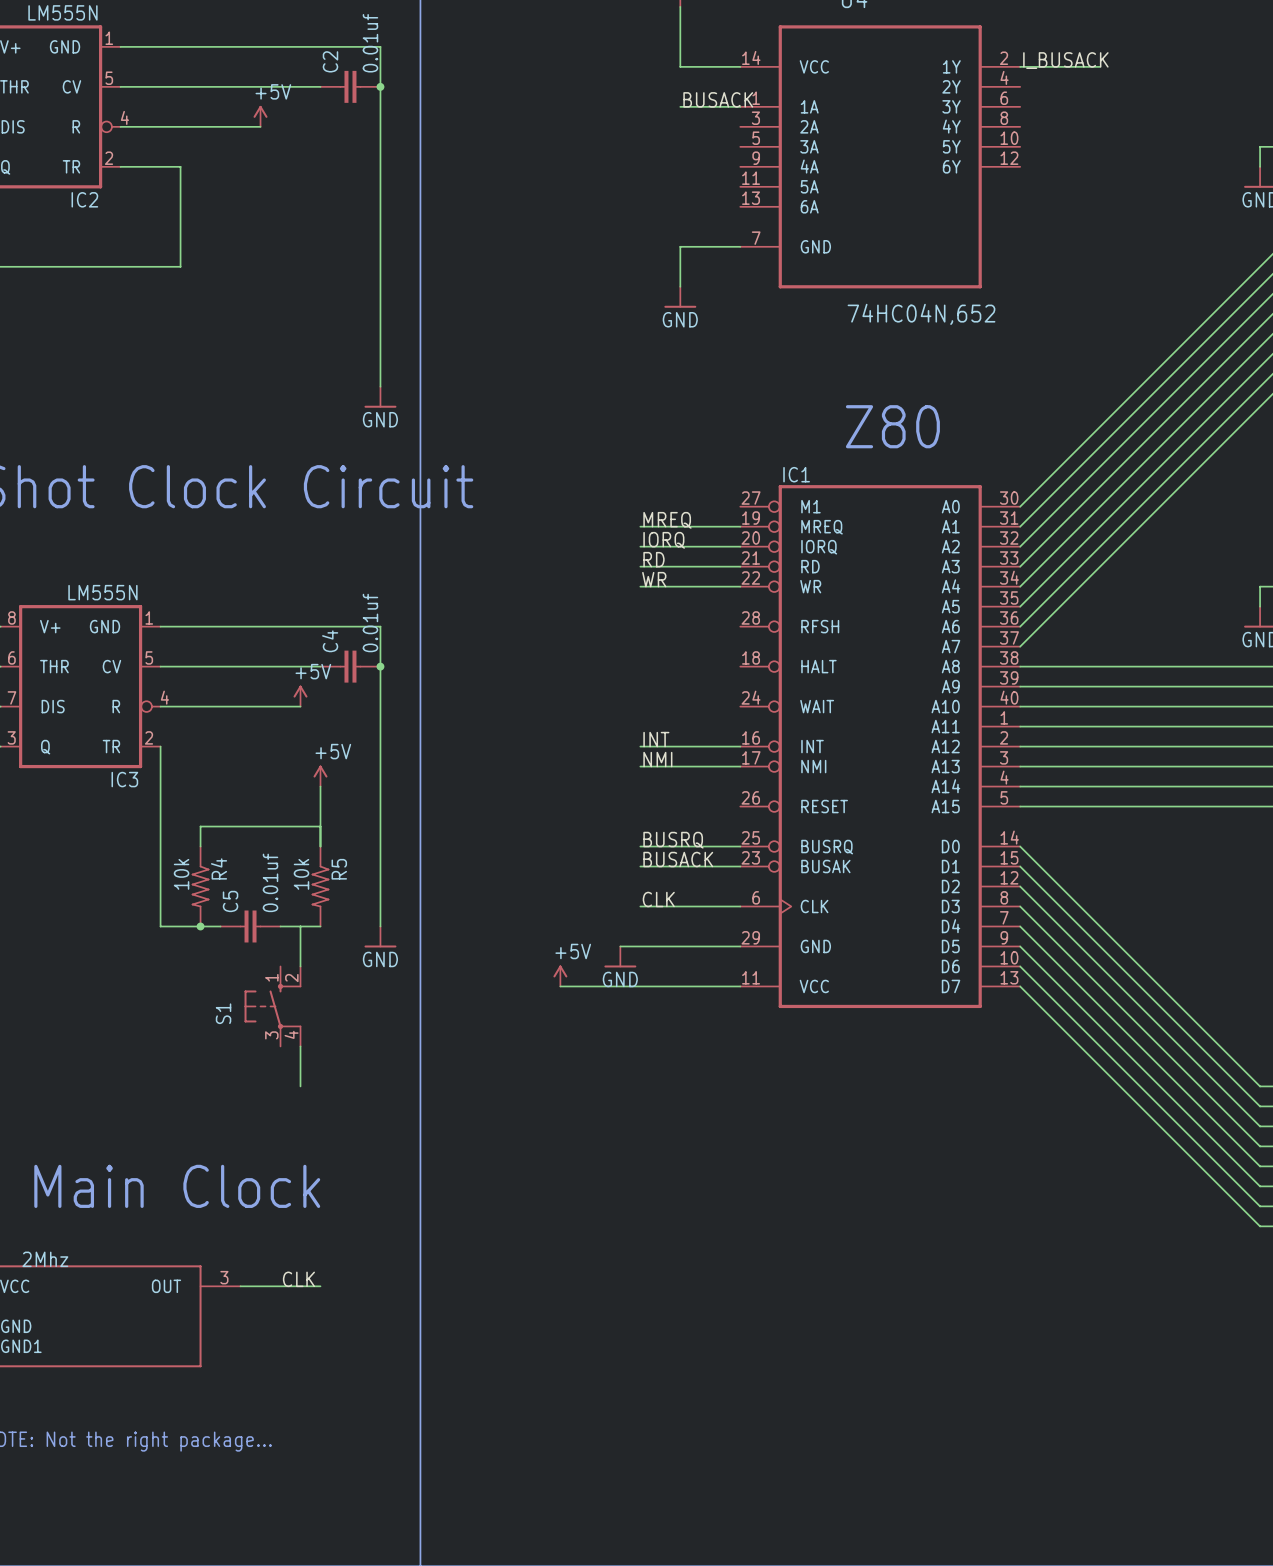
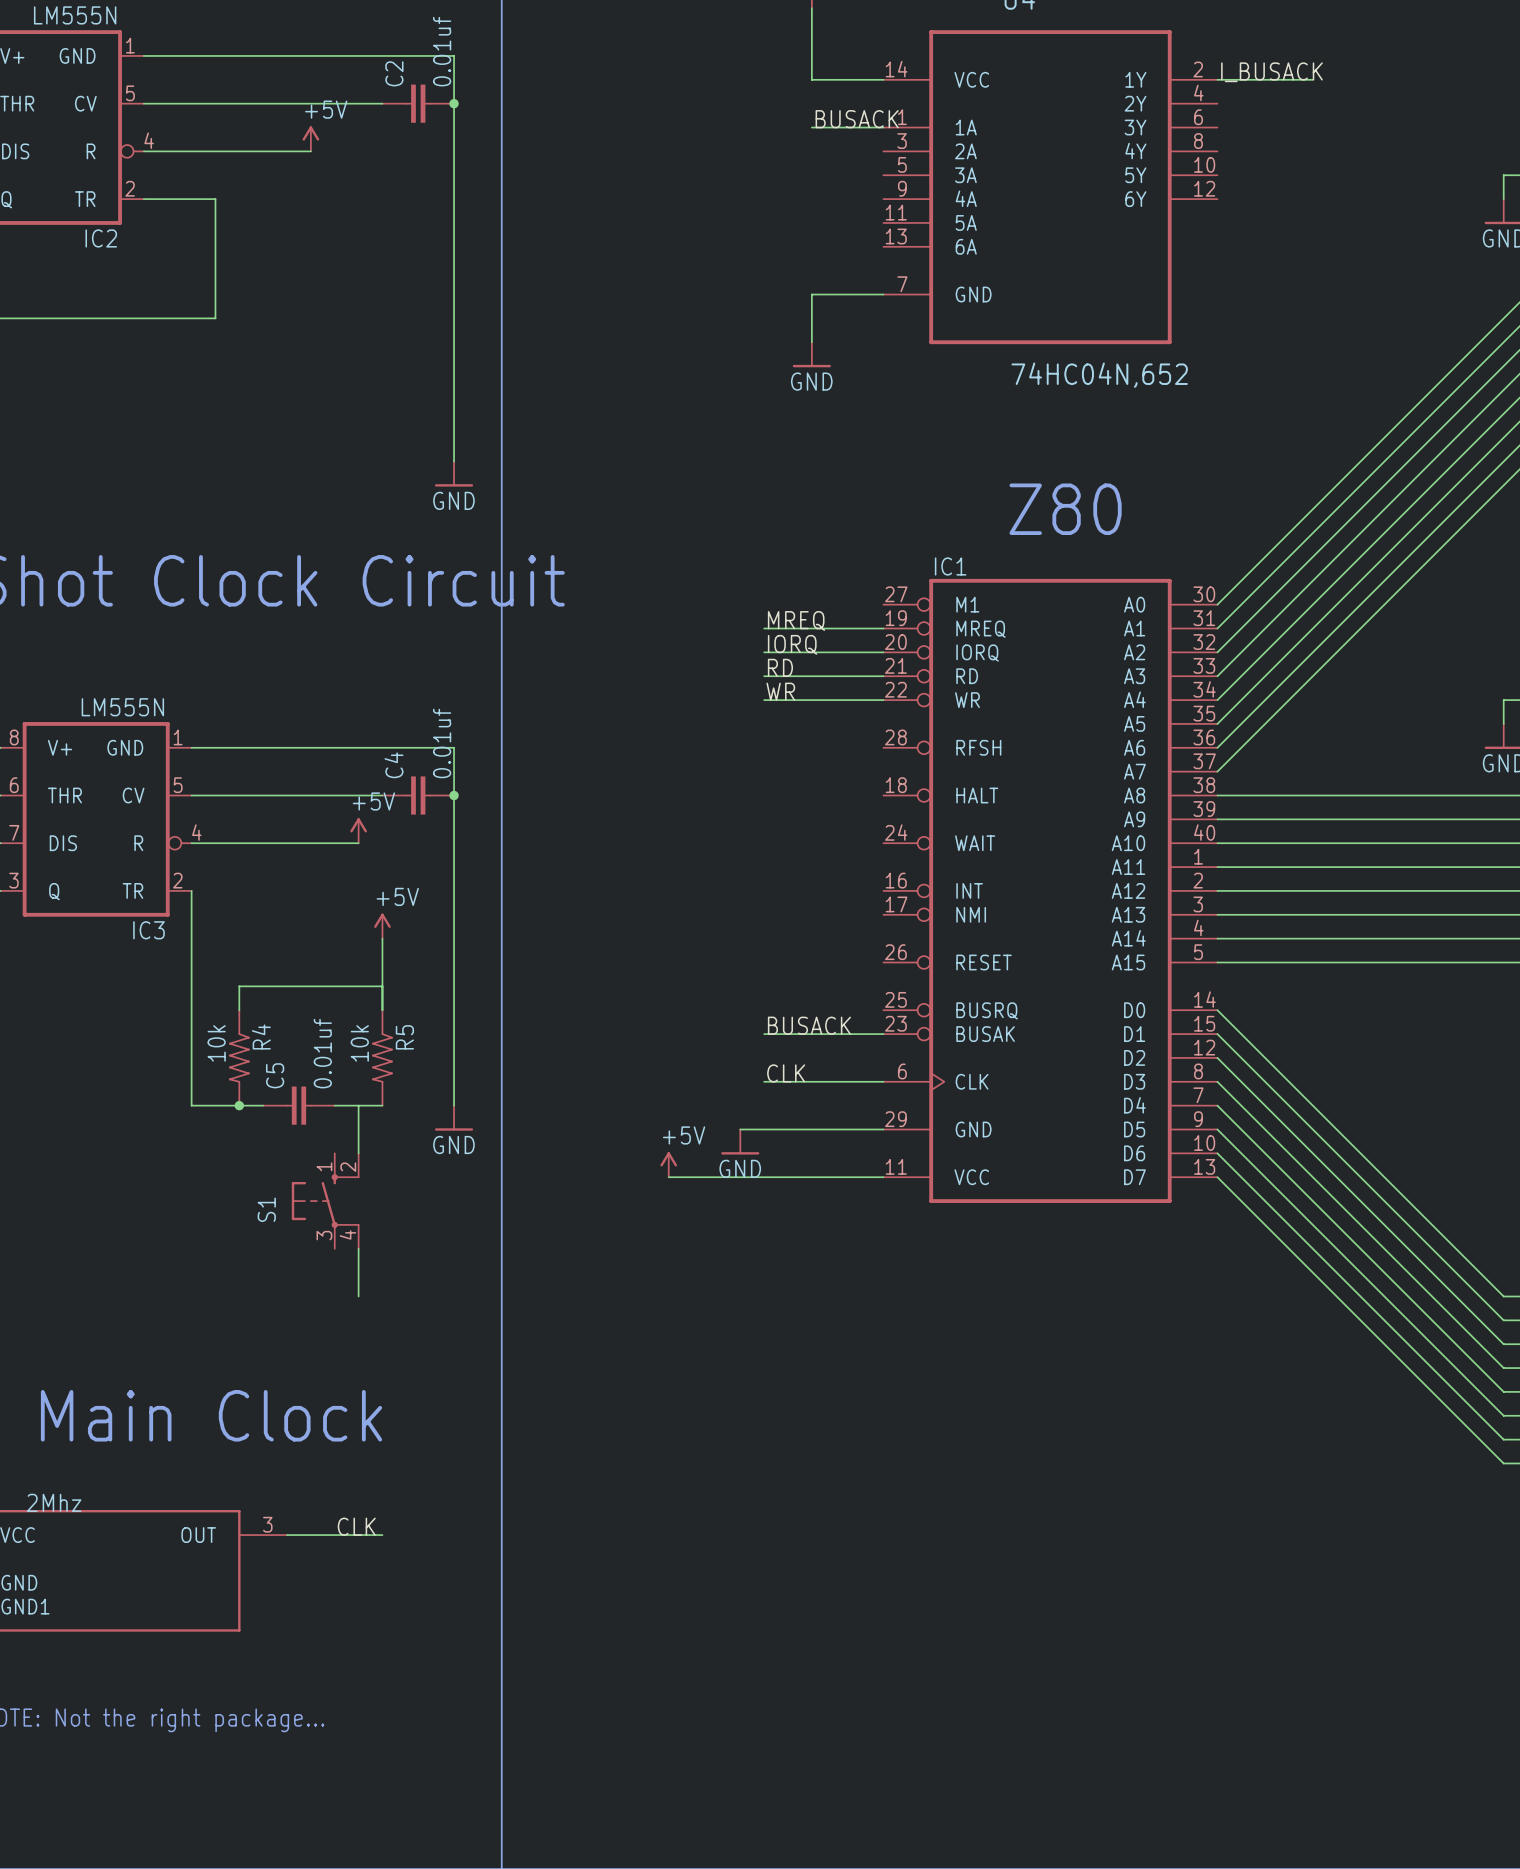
label: INT (656, 739) -> none
wire: (640, 746) (740, 746) -> none
label: NMI (657, 759) -> none
wire: (640, 766) (740, 766) -> none
label: BUSRQ (673, 840) -> none
wire: (640, 846) (740, 846) -> none

